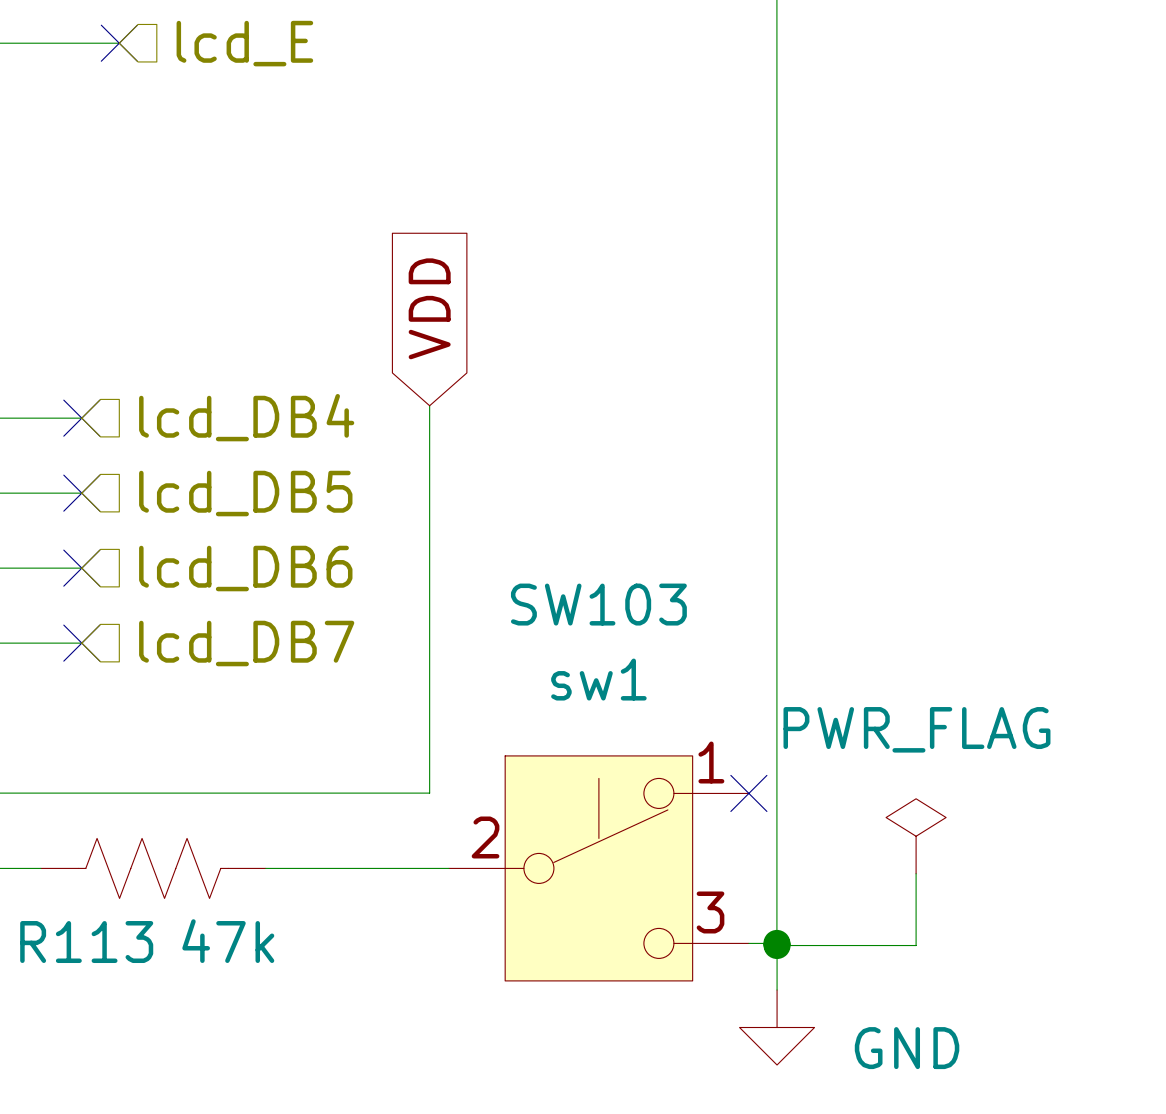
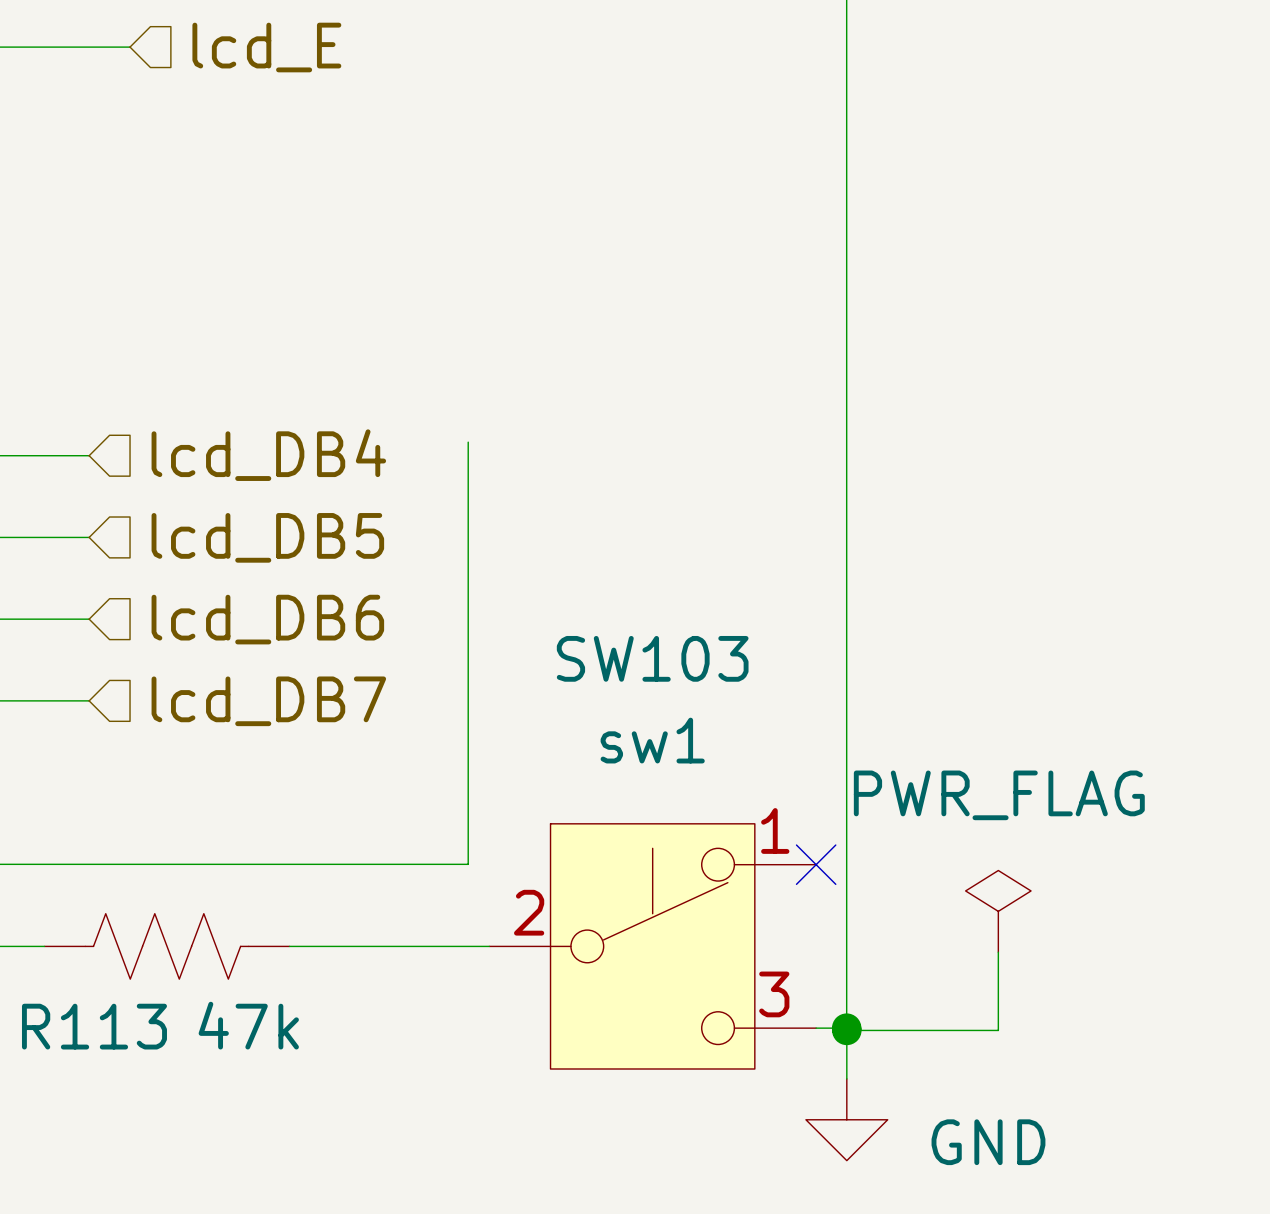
no-connect mark: (119, 43) -> none
global label: VDD (429, 308) -> none
no-connect mark: (81, 418) -> none
no-connect mark: (81, 493) -> none
no-connect mark: (81, 568) -> none
no-connect mark: (81, 643) -> none

